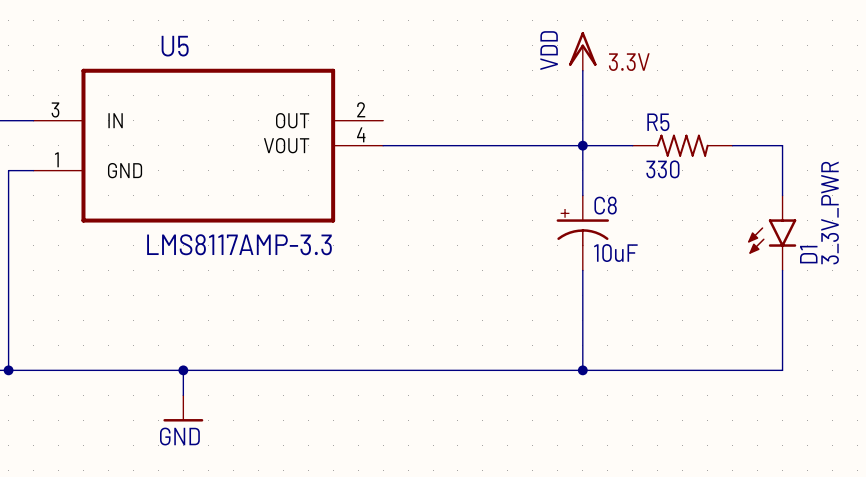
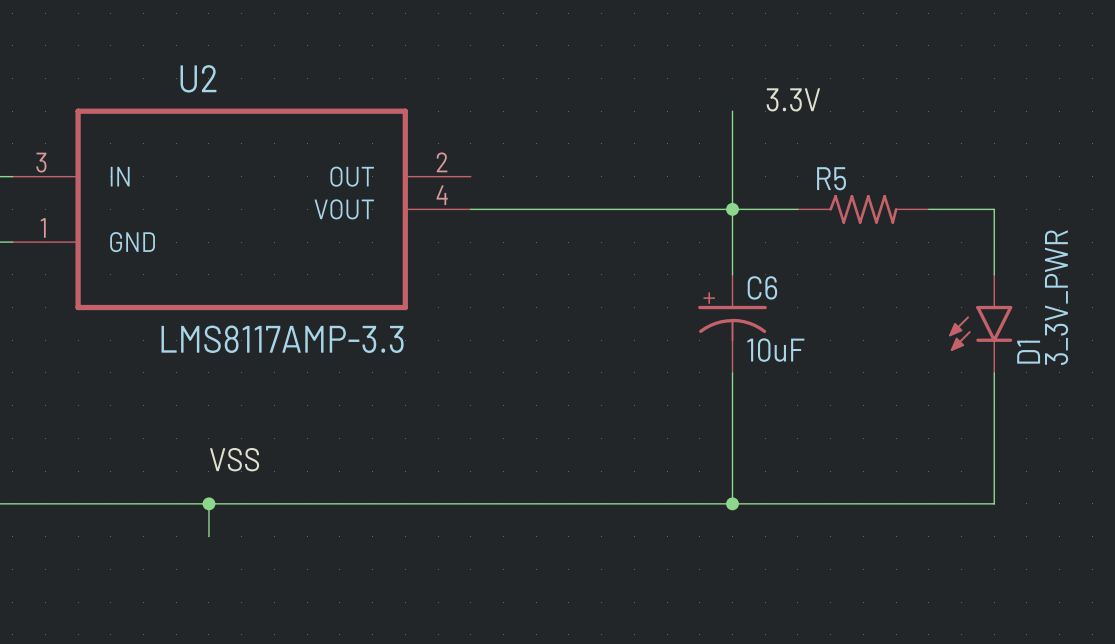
U5 name: U5 (175, 46) -> U2 (198, 78)
power symbol: VDD (582, 51) -> none
R5 value: 330 (662, 169) -> none
C8 name: C8 (605, 205) -> C6 (762, 287)
label: none -> VSS (234, 459)
power symbol: GND (183, 408) -> none

